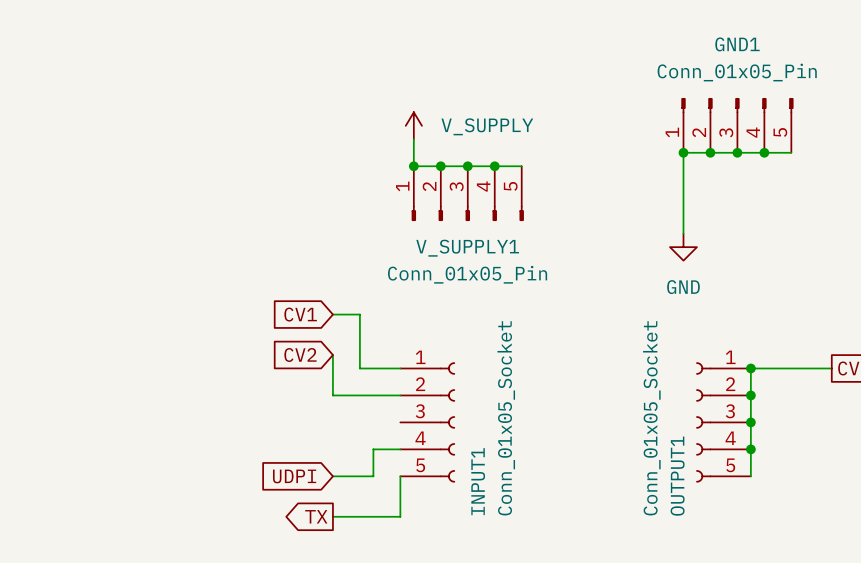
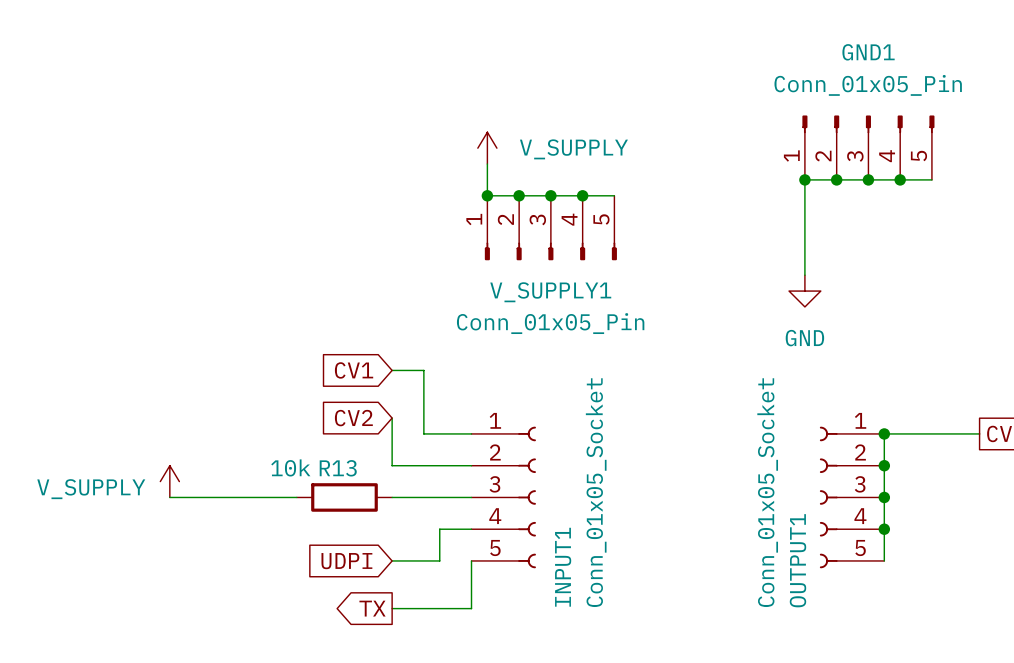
power symbol: none -> V_SUPPLY (169, 481)
wire: none -> (169, 497) (296, 497)
R13: none -> 10k (344, 497)
wire: none -> (392, 497) (471, 497)

